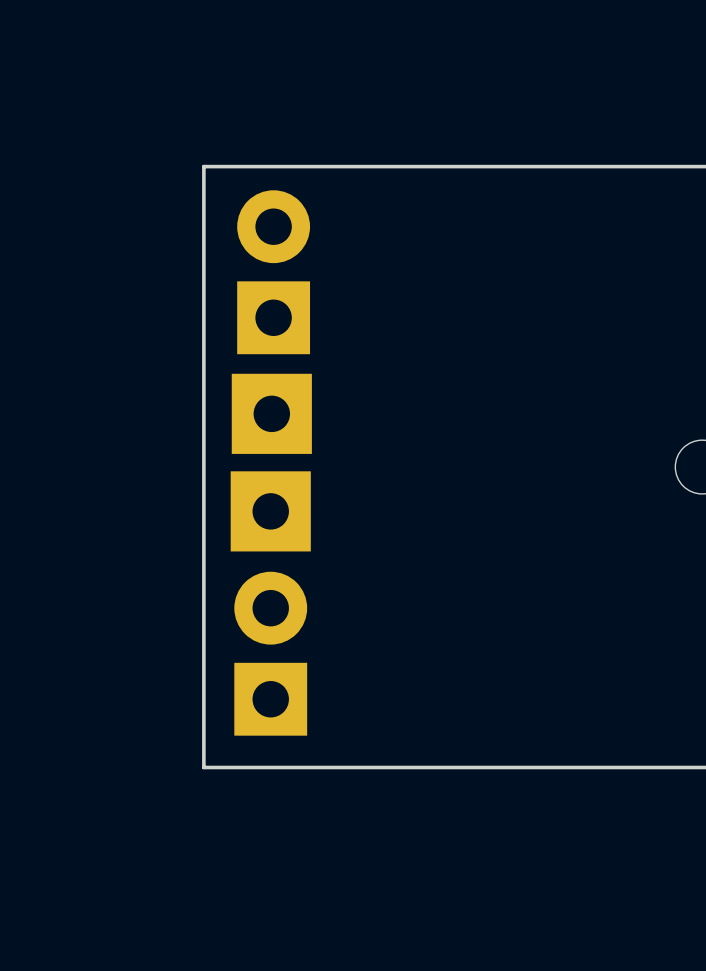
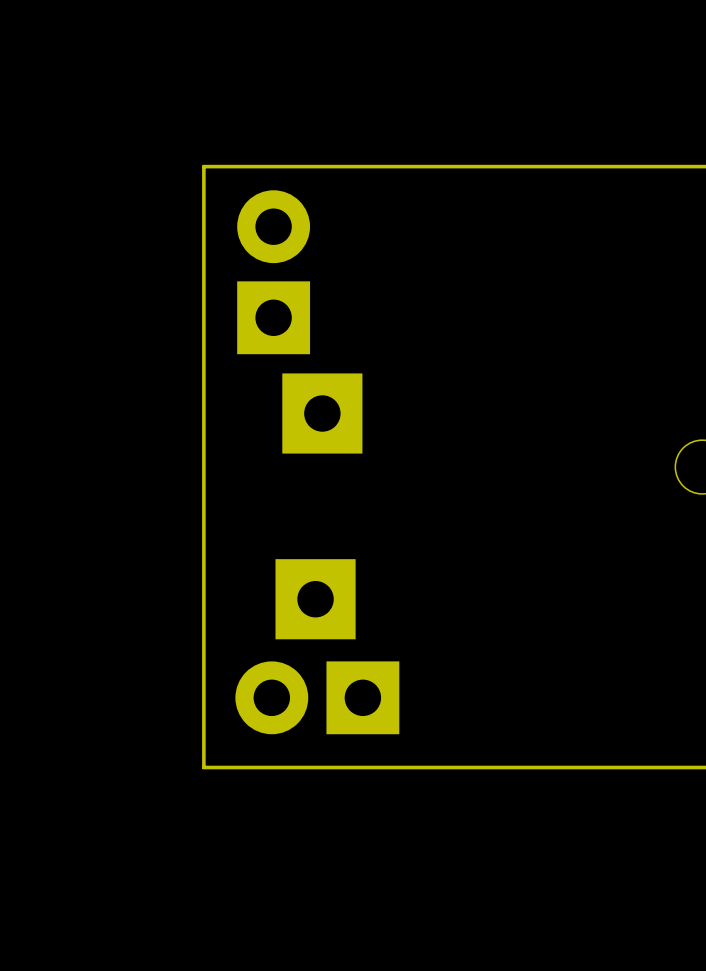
part position: (271, 413) -> (322, 413)
part: (270, 511) -> none
part: none -> (315, 599)
part rotation: 0° (270, 653) -> 90° counterclockwise (317, 697)

